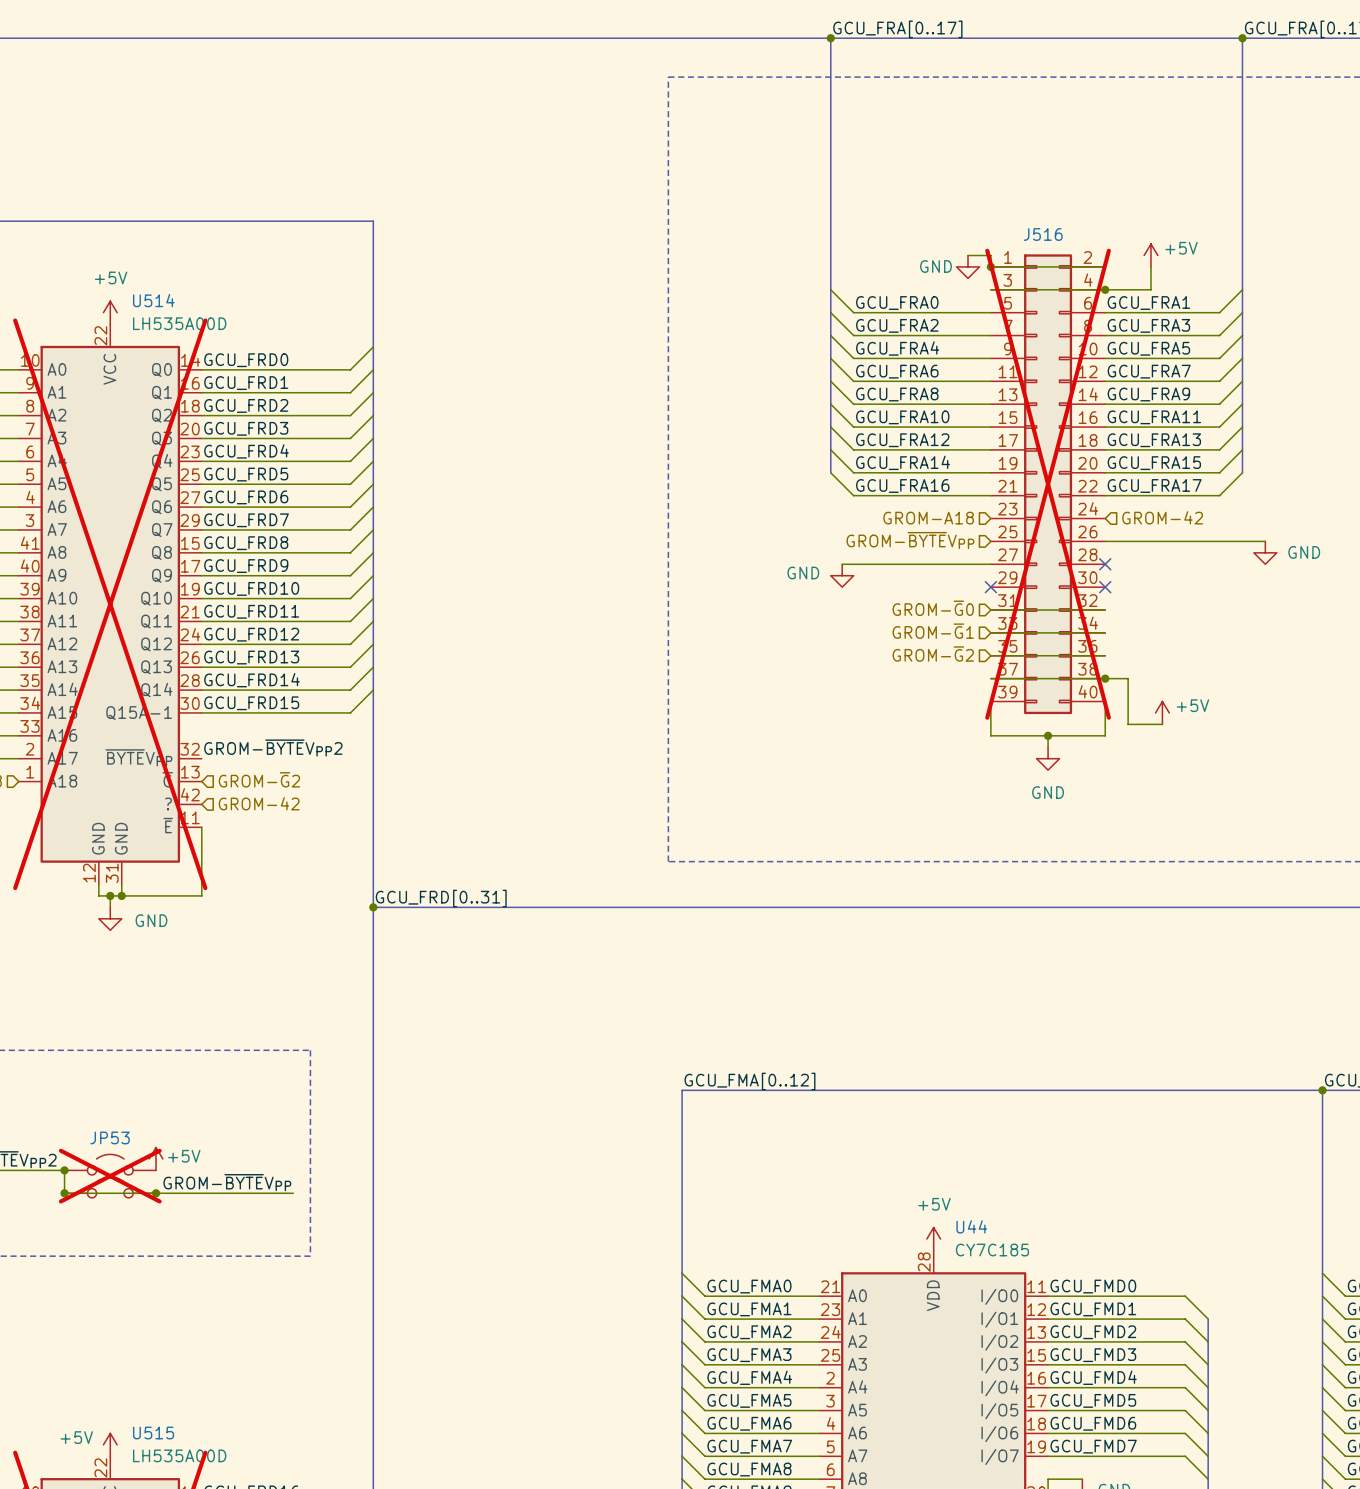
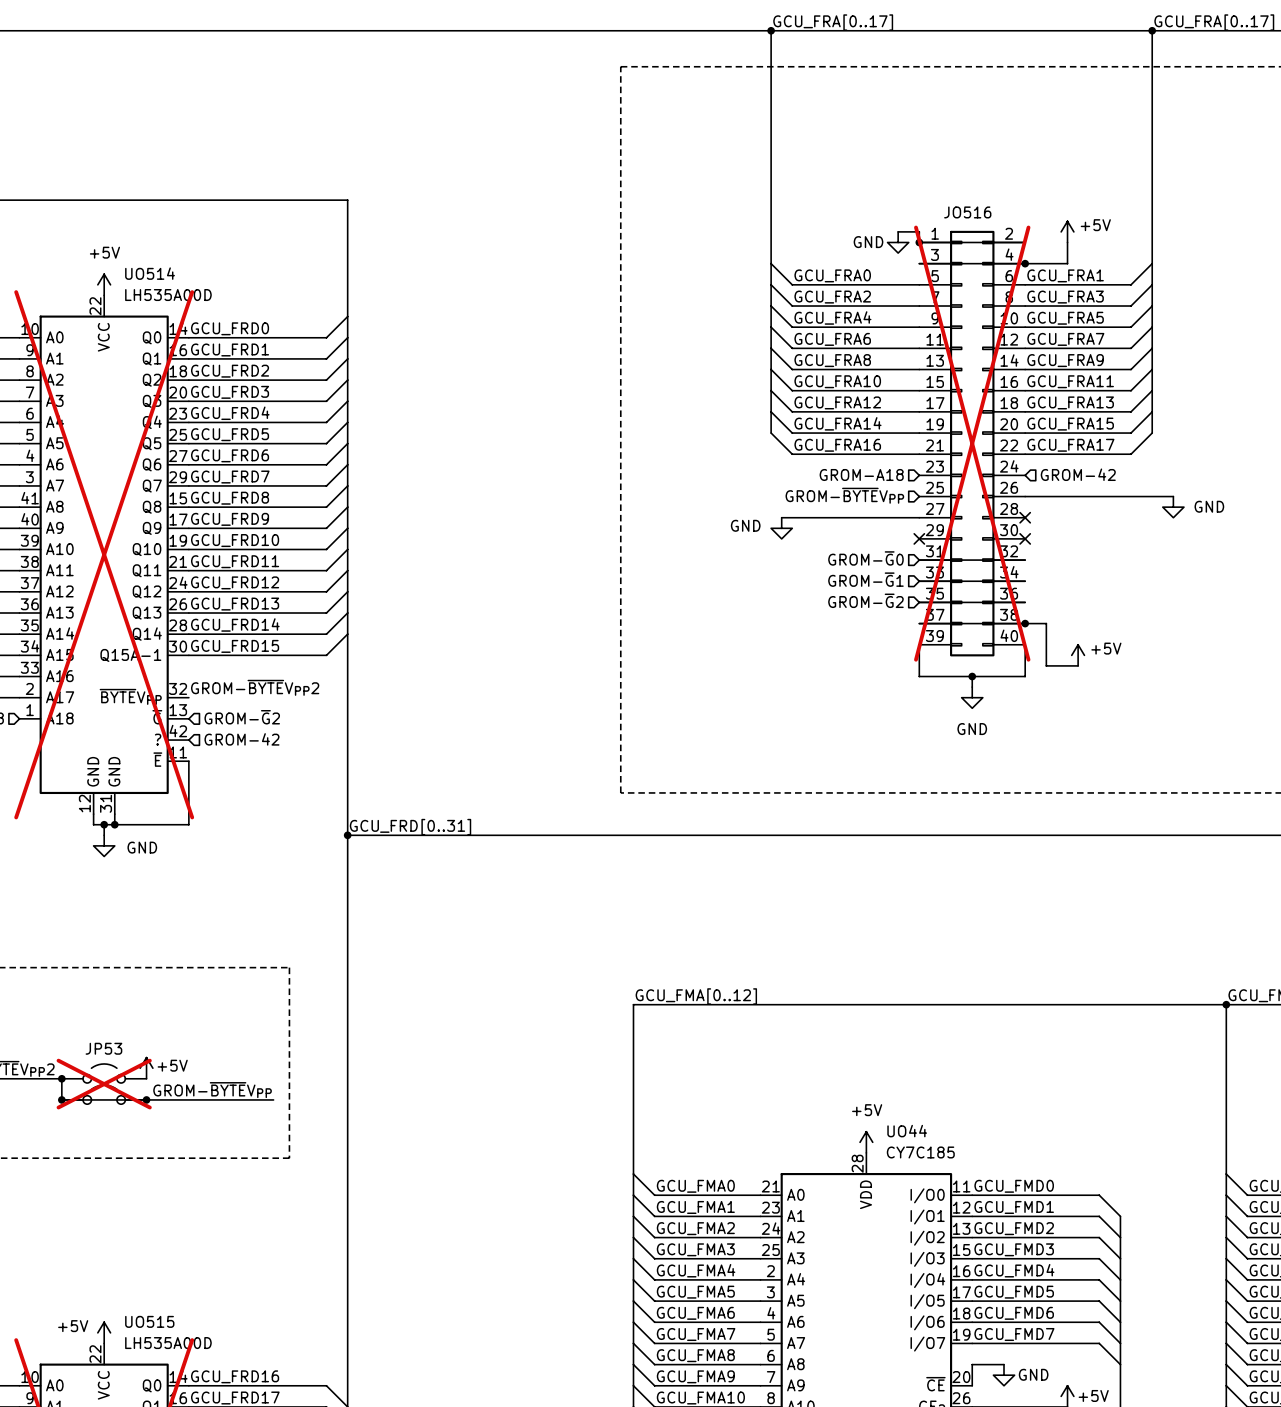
J516 name: J516 (1043, 234) -> JO516 (967, 212)
U514 name: U514 (153, 300) -> UO514 (150, 273)
U44 name: U44 (971, 1226) -> UO44 (907, 1131)
U515 name: U515 (153, 1433) -> UO515 (149, 1321)

